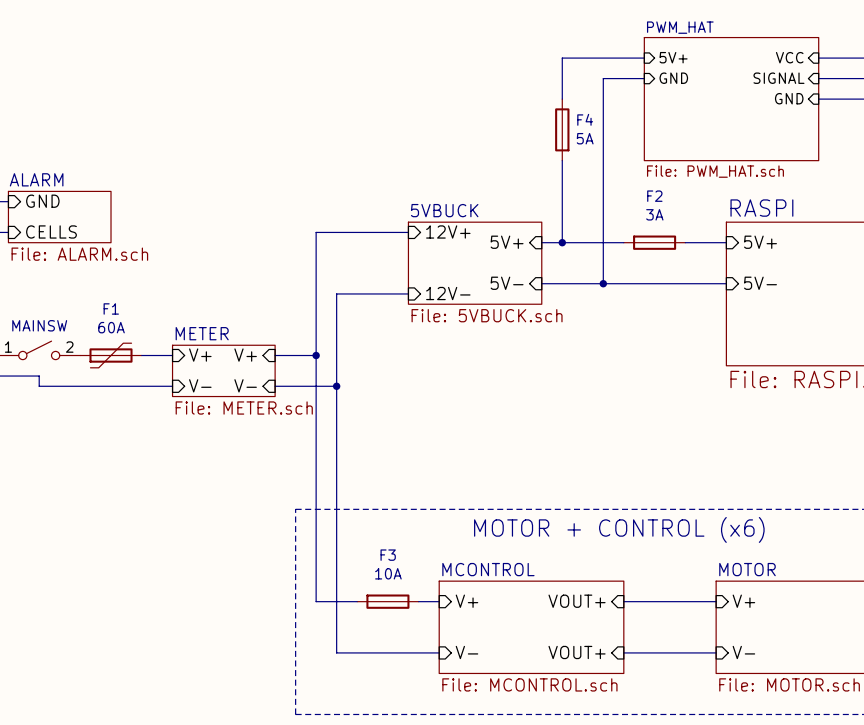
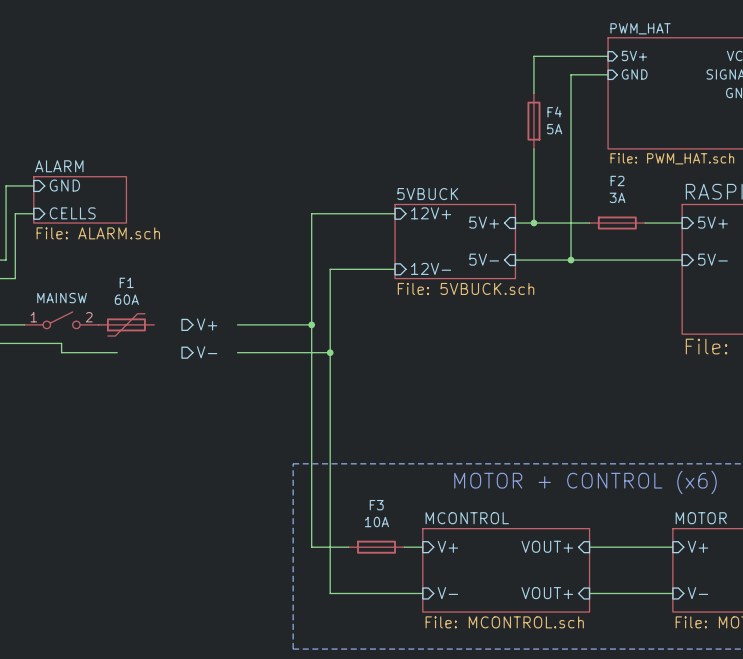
wire: (141, 355) (172, 355) -> none
wire: none -> (237, 324) (274, 324)
sheet pin: V+ (245, 355) -> none
sheet METER: File: METER.sch (223, 370) -> none
sheet pin: V- (245, 385) -> none
wire: (100, 386) (172, 386) -> none
wire: none -> (237, 352) (274, 352)

